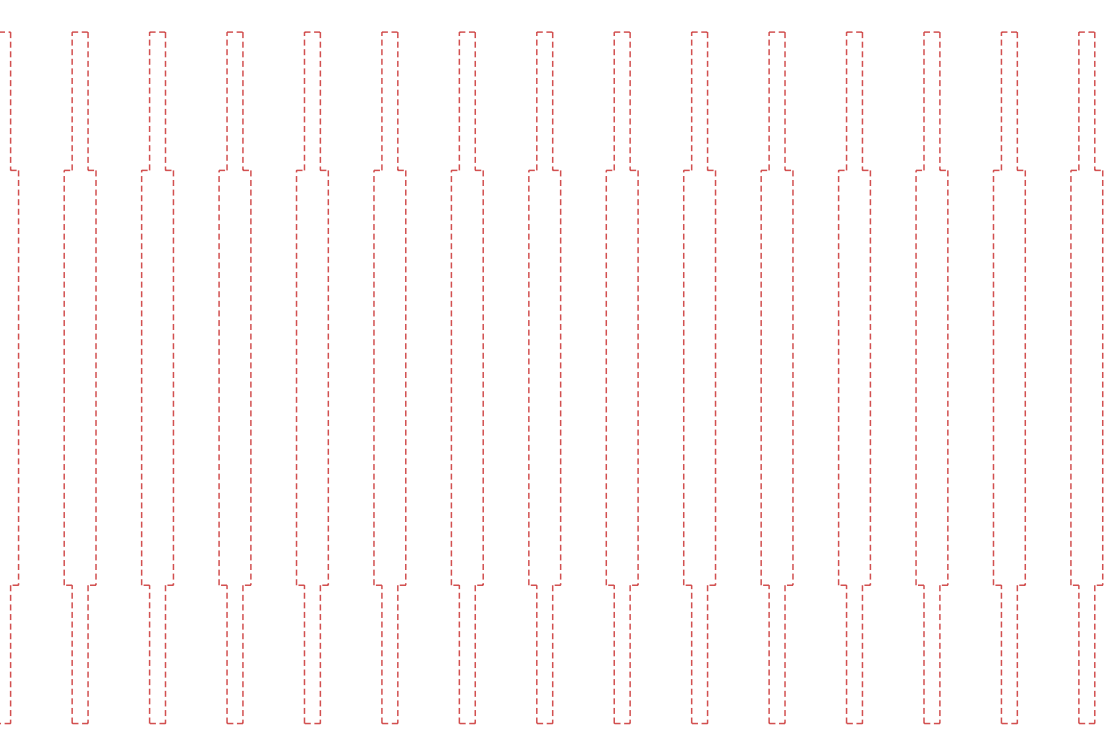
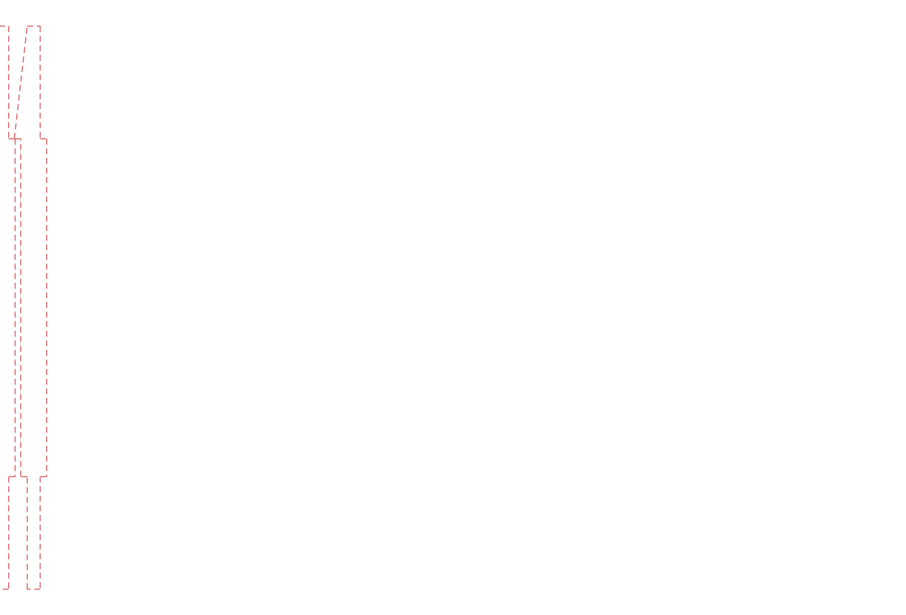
zone outline: (72, 32) (88, 32) (88, 170) (96, 170) (96, 585) (88, 585) (88, 723) (72, 723) (72, 585) (64, 585) (64, 170) (72, 170) (72, 32) -> none
zone outline: (149, 32) (165, 32) (165, 170) (173, 170) (173, 585) (165, 585) (165, 723) (149, 723) (149, 585) (141, 585) (141, 170) (149, 170) (149, 32) -> none
zone outline: (227, 32) (242, 32) (242, 170) (250, 170) (250, 585) (242, 585) (242, 723) (227, 723) (227, 585) (219, 585) (219, 170) (227, 170) (227, 32) -> none
zone outline: (304, 32) (320, 32) (320, 170) (328, 170) (328, 585) (320, 585) (320, 723) (304, 723) (304, 585) (296, 585) (296, 170) (304, 170) (304, 32) -> none
zone outline: (381, 32) (397, 32) (397, 170) (405, 170) (405, 585) (397, 585) (397, 723) (381, 723) (381, 585) (373, 585) (373, 170) (381, 170) (381, 32) -> none
zone outline: (459, 32) (475, 32) (475, 170) (483, 170) (483, 585) (475, 585) (475, 723) (459, 723) (459, 585) (451, 585) (451, 170) (459, 170) (459, 32) -> none
zone outline: (536, 32) (552, 32) (552, 170) (560, 170) (560, 585) (552, 585) (552, 723) (536, 723) (536, 585) (528, 585) (528, 170) (536, 170) (536, 32) -> none
zone outline: (614, 32) (630, 32) (630, 170) (638, 170) (638, 585) (630, 585) (630, 723) (614, 723) (614, 585) (606, 585) (606, 170) (614, 170) (614, 32) -> none
zone outline: (691, 32) (707, 32) (707, 170) (715, 170) (715, 585) (707, 585) (707, 723) (691, 723) (691, 585) (683, 585) (683, 170) (691, 170) (691, 32) -> none
zone outline: (769, 32) (785, 32) (785, 170) (792, 170) (792, 585) (785, 585) (785, 723) (769, 723) (769, 585) (761, 585) (761, 170) (769, 170) (769, 32) -> none
zone outline: (846, 32) (862, 32) (862, 170) (870, 170) (870, 585) (862, 585) (862, 723) (846, 723) (846, 585) (838, 585) (838, 170) (846, 170) (846, 32) -> none
zone outline: (923, 32) (939, 32) (939, 170) (947, 170) (947, 585) (939, 585) (939, 723) (923, 723) (923, 585) (916, 585) (916, 170) (923, 170) (923, 32) -> none
zone outline: (1001, 32) (1017, 32) (1017, 170) (1025, 170) (1025, 585) (1017, 585) (1017, 723) (1001, 723) (1001, 585) (993, 585) (993, 170) (1001, 170) (1001, 32) -> none
zone outline: (1078, 32) (1094, 32) (1094, 170) (1102, 170) (1102, 585) (1094, 585) (1094, 723) (1078, 723) (1078, 585) (1070, 585) (1070, 170) (1078, 170) (1078, 32) -> none
zone outline: none -> (14, 138) (27, 26) (40, 26) (40, 138) (46, 138) (46, 476) (40, 476) (40, 589) (27, 589) (27, 476) (20, 476) (20, 138) (15, 138)

